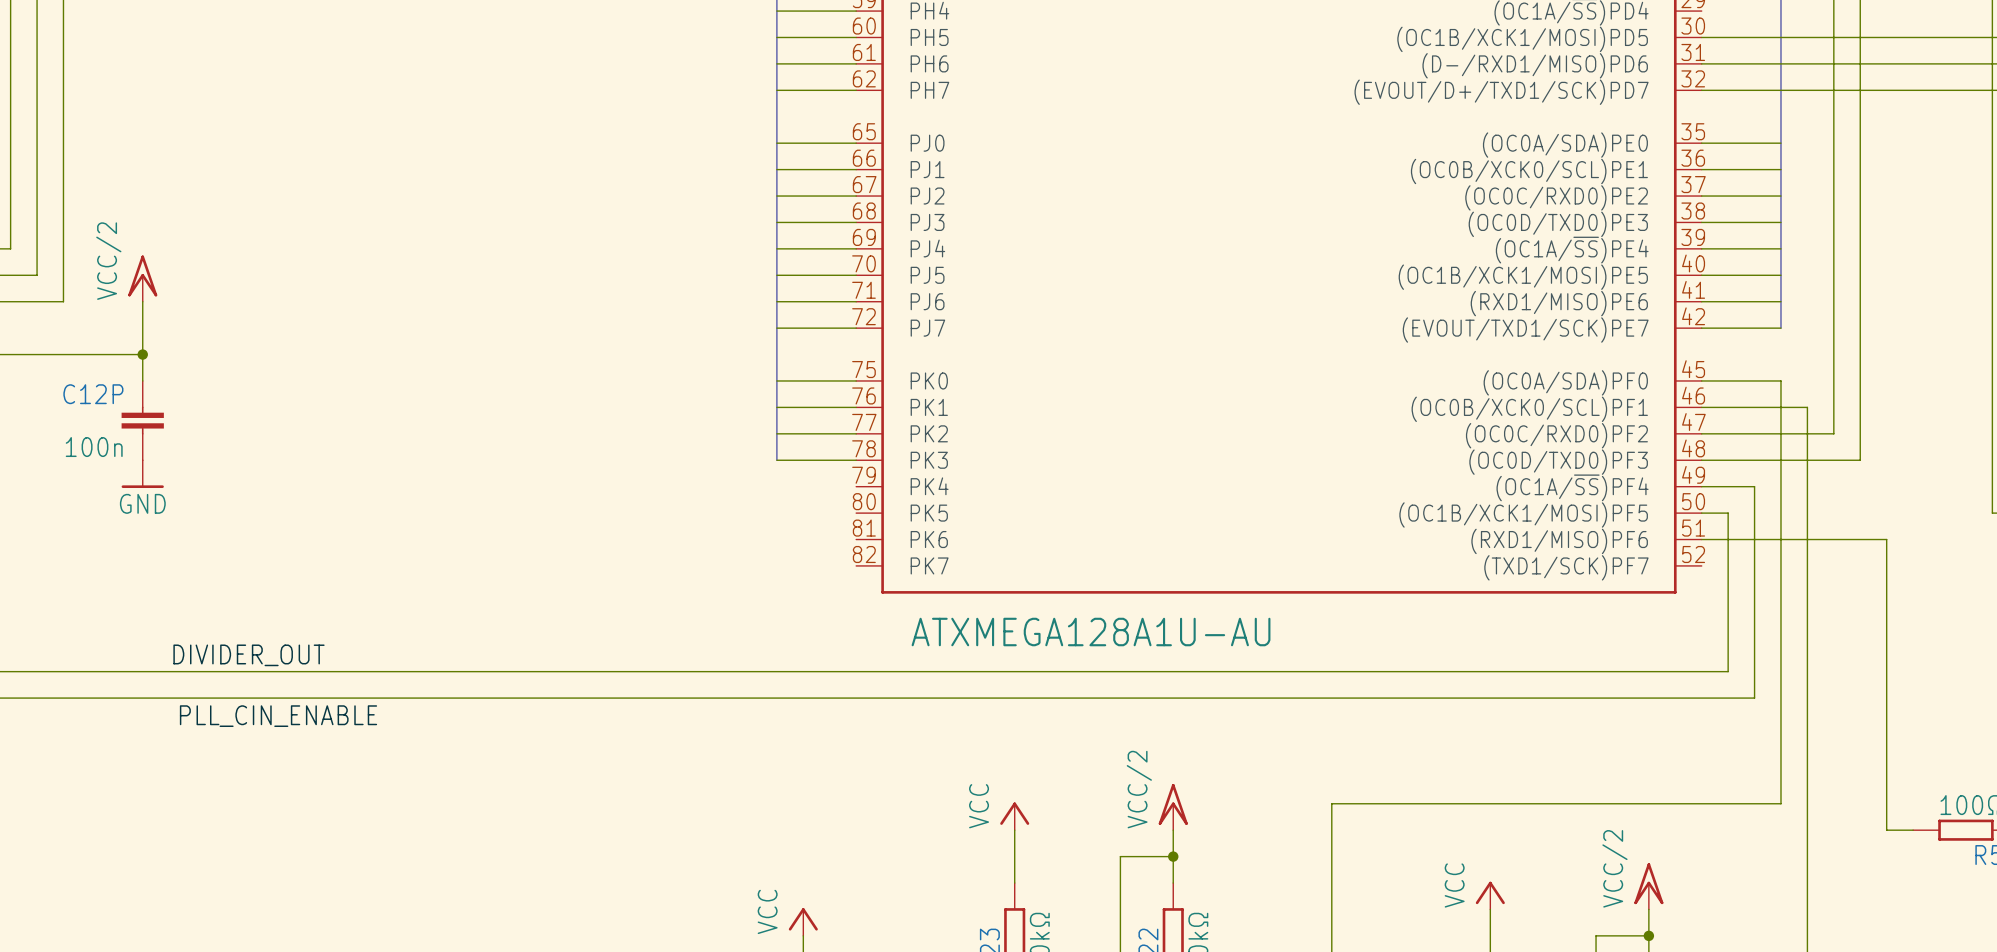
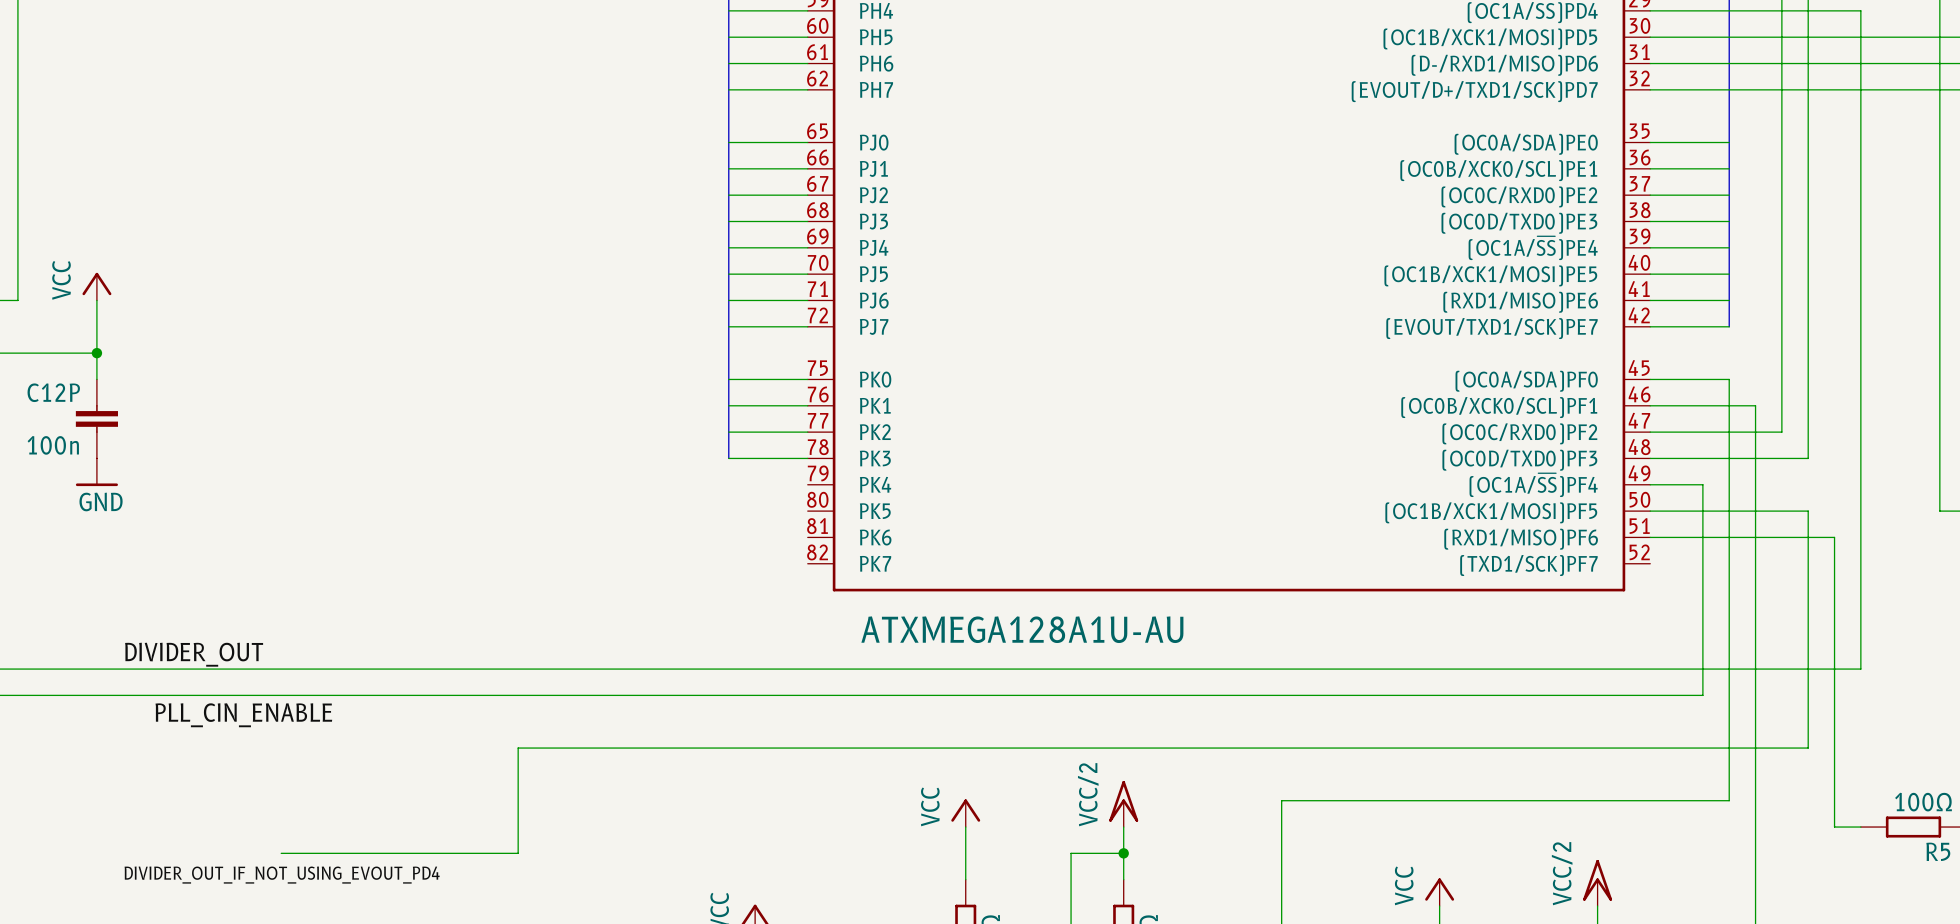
power symbol: VCC/2 (142, 278) -> VCC (96, 286)
wire: (1728, 513) (1728, 671) -> (1650, 10) (1860, 10) (1860, 669) (1676, 669)
wire: none -> (1676, 511) (1808, 511) (1808, 748) (518, 748) (518, 853) (281, 853)
label: none -> DIVIDER_OUT_IF_NOT_USING_EVOUT_PD4 (282, 875)

